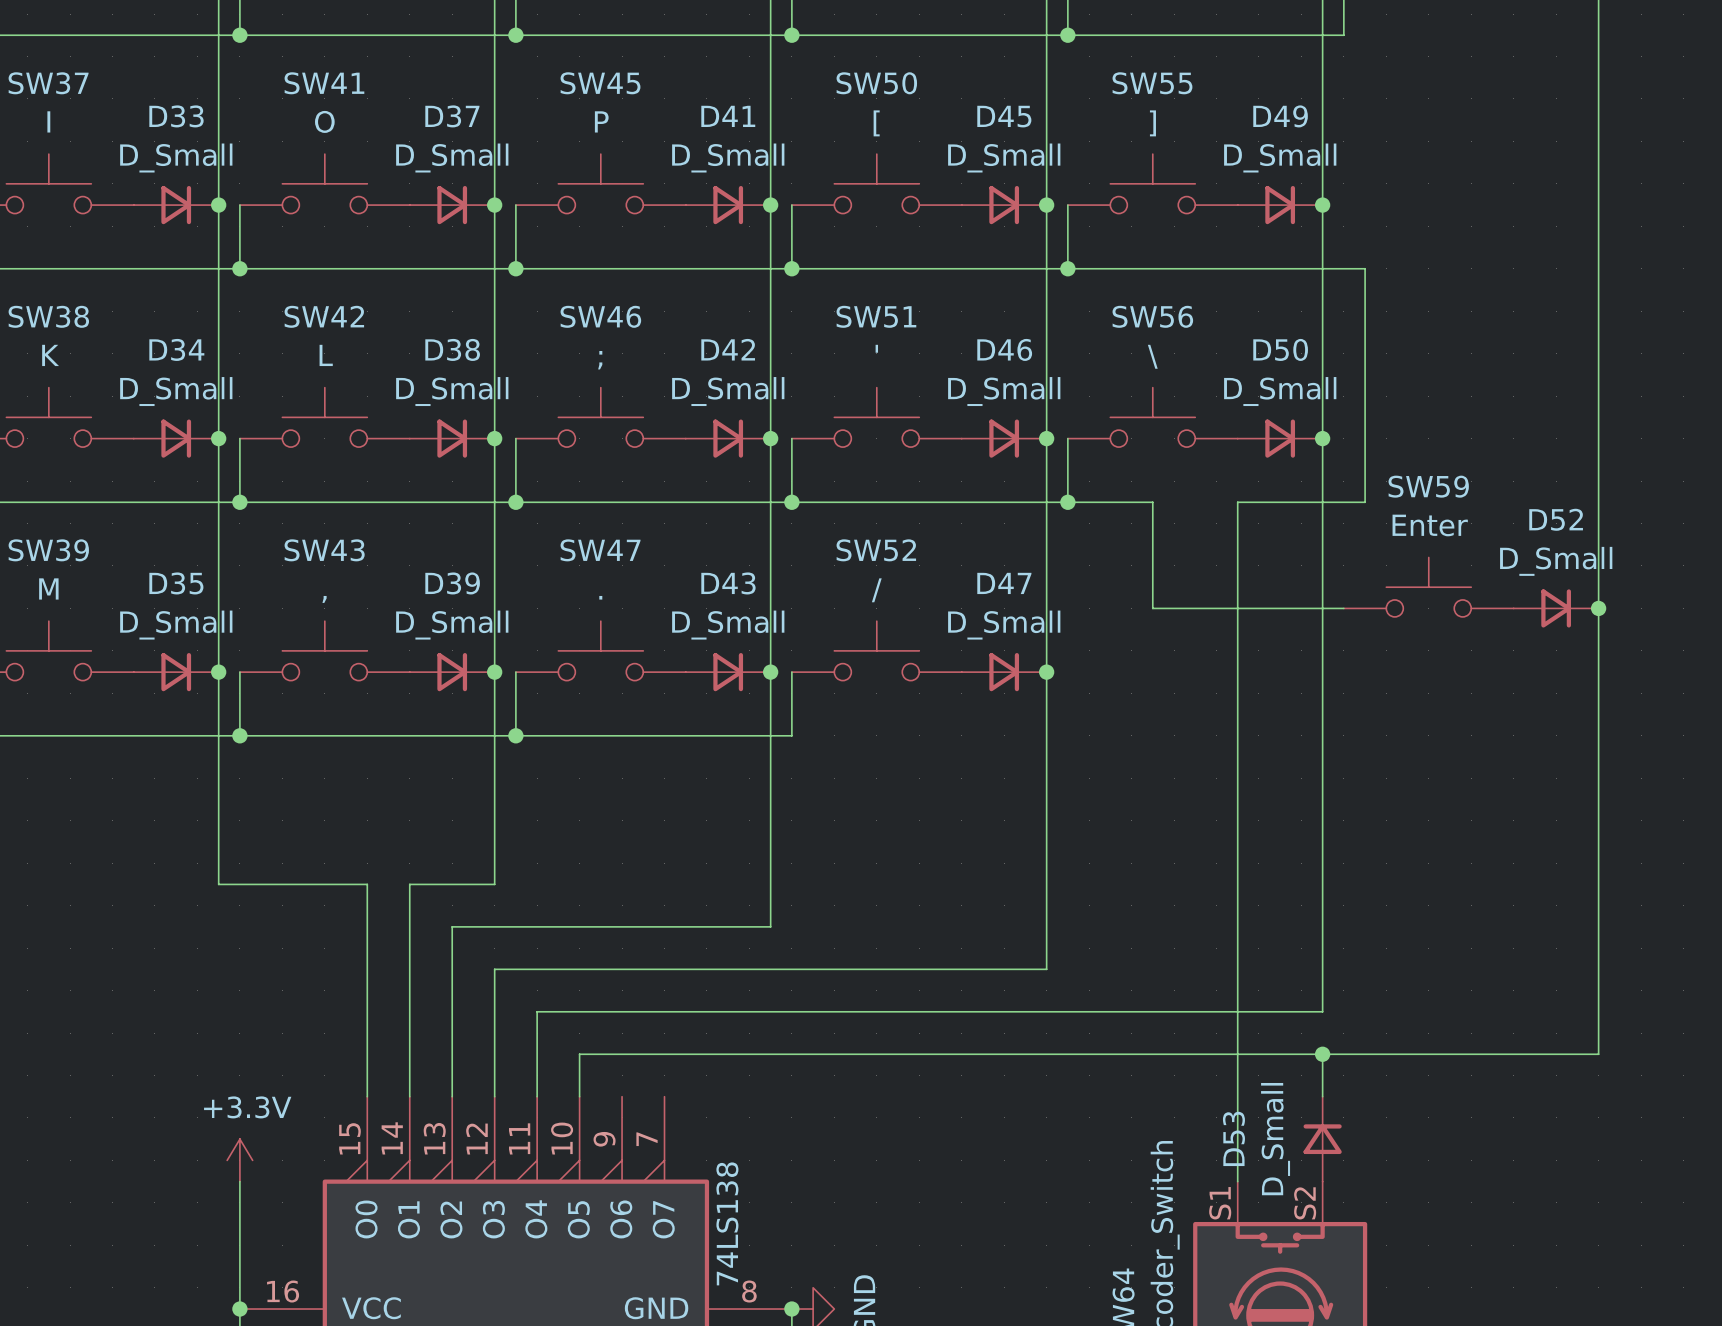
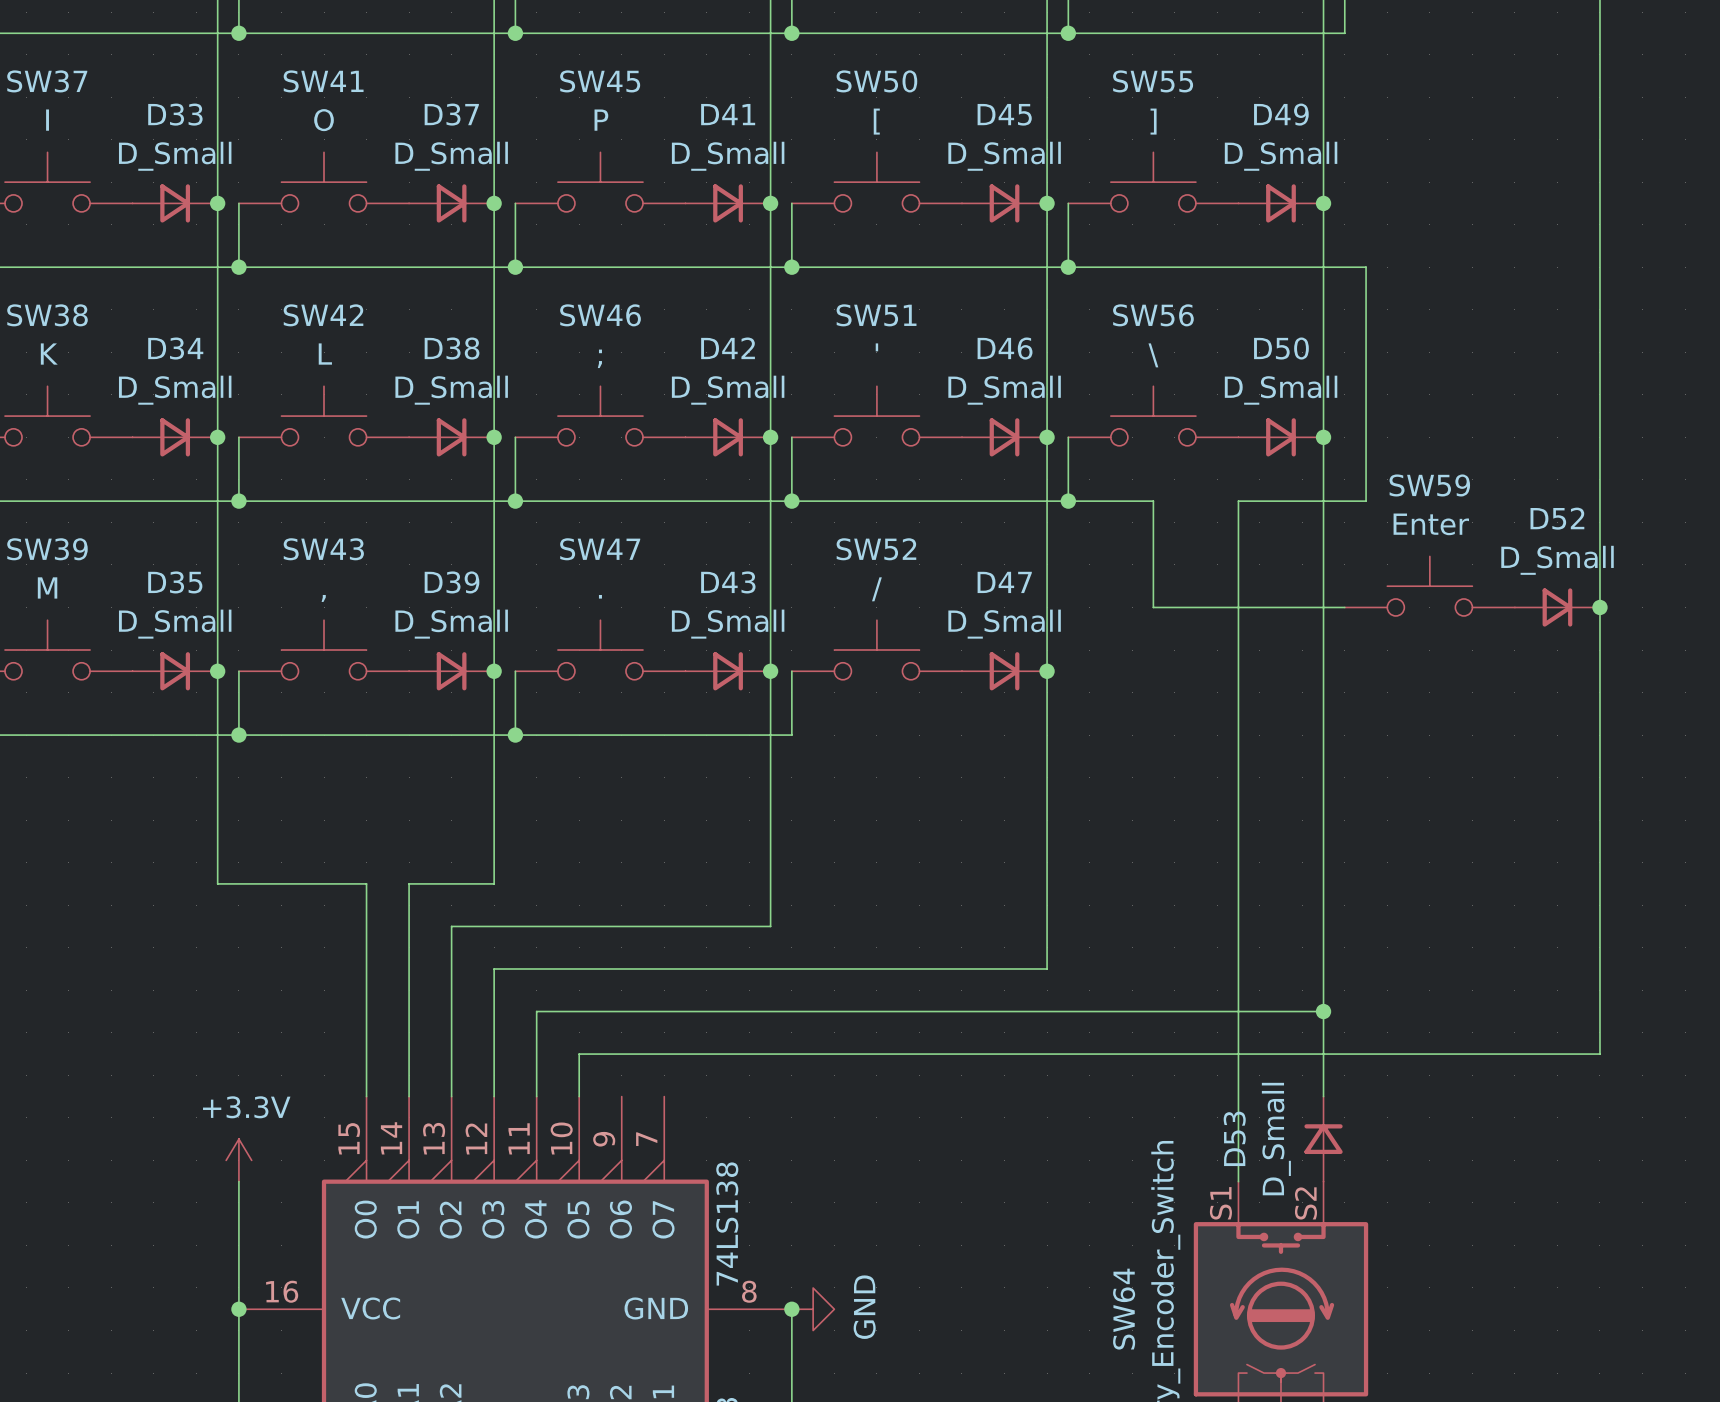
wire: none -> (1323, 1011) (1323, 1054)
junction position: (1322, 1054) -> (1323, 1011)

